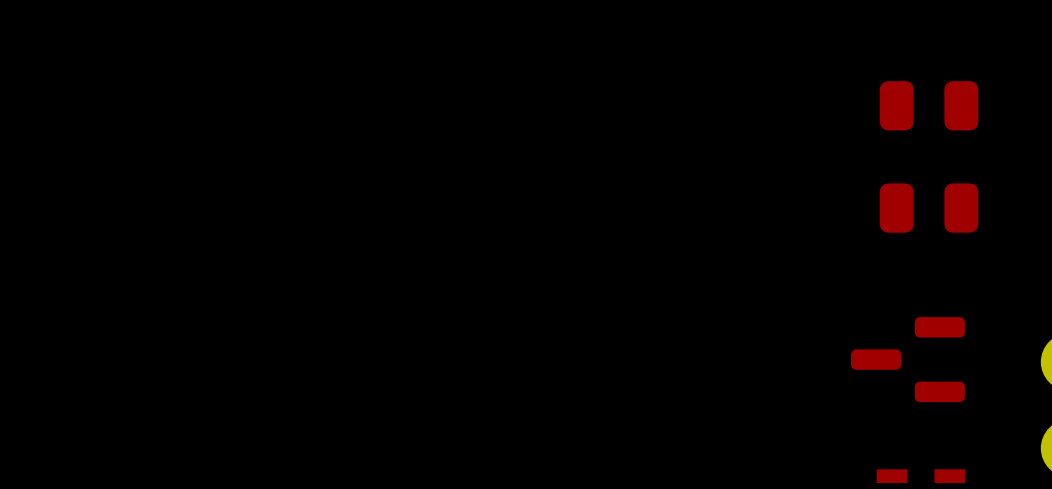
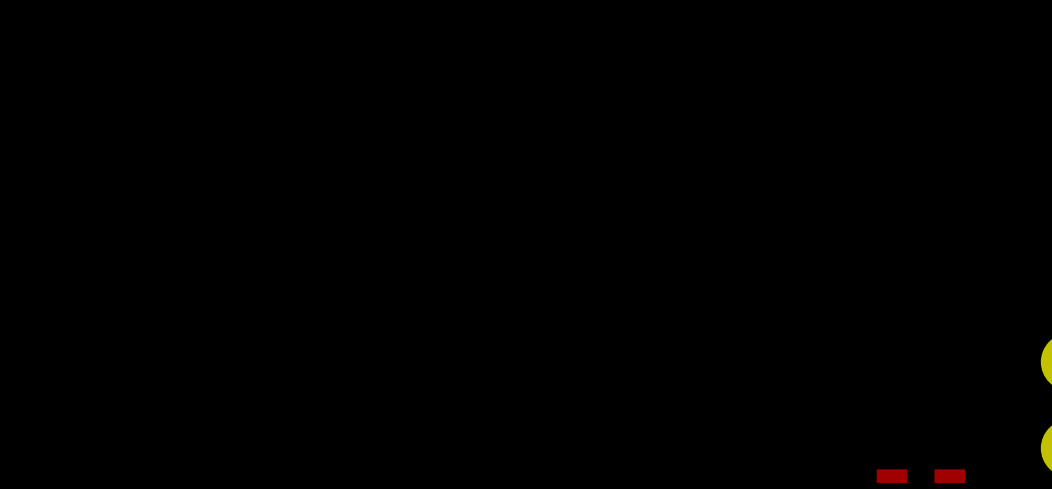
part: (929, 105) -> none
part: (929, 208) -> none
part: (907, 359) -> none

